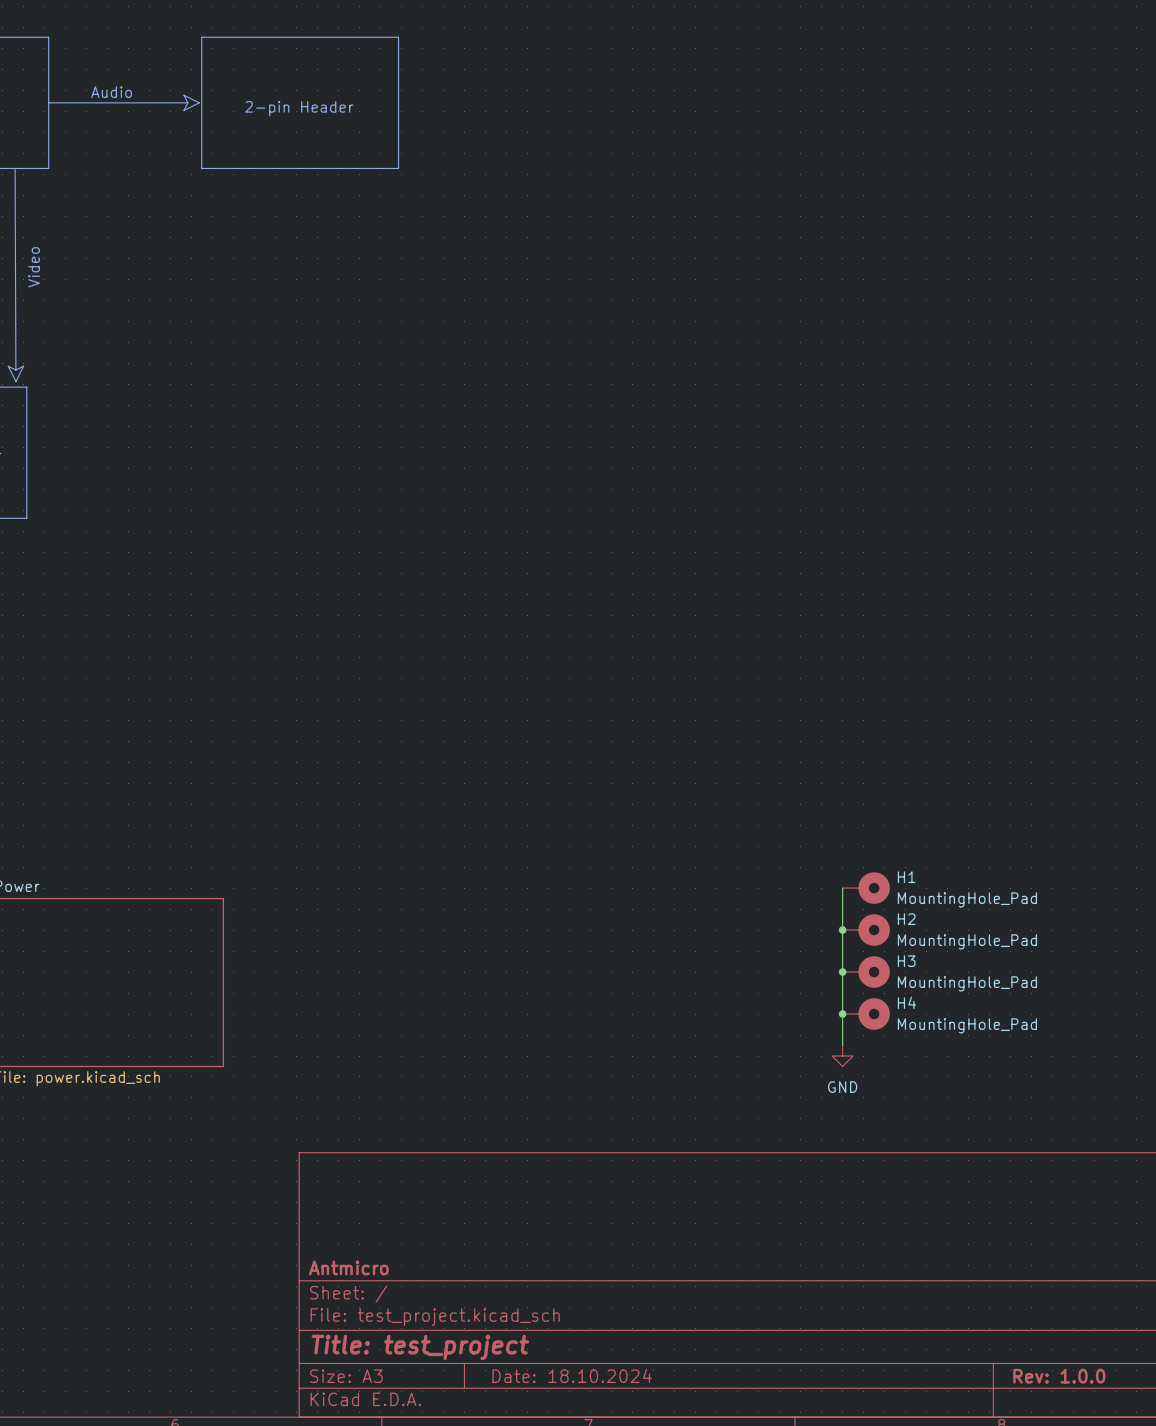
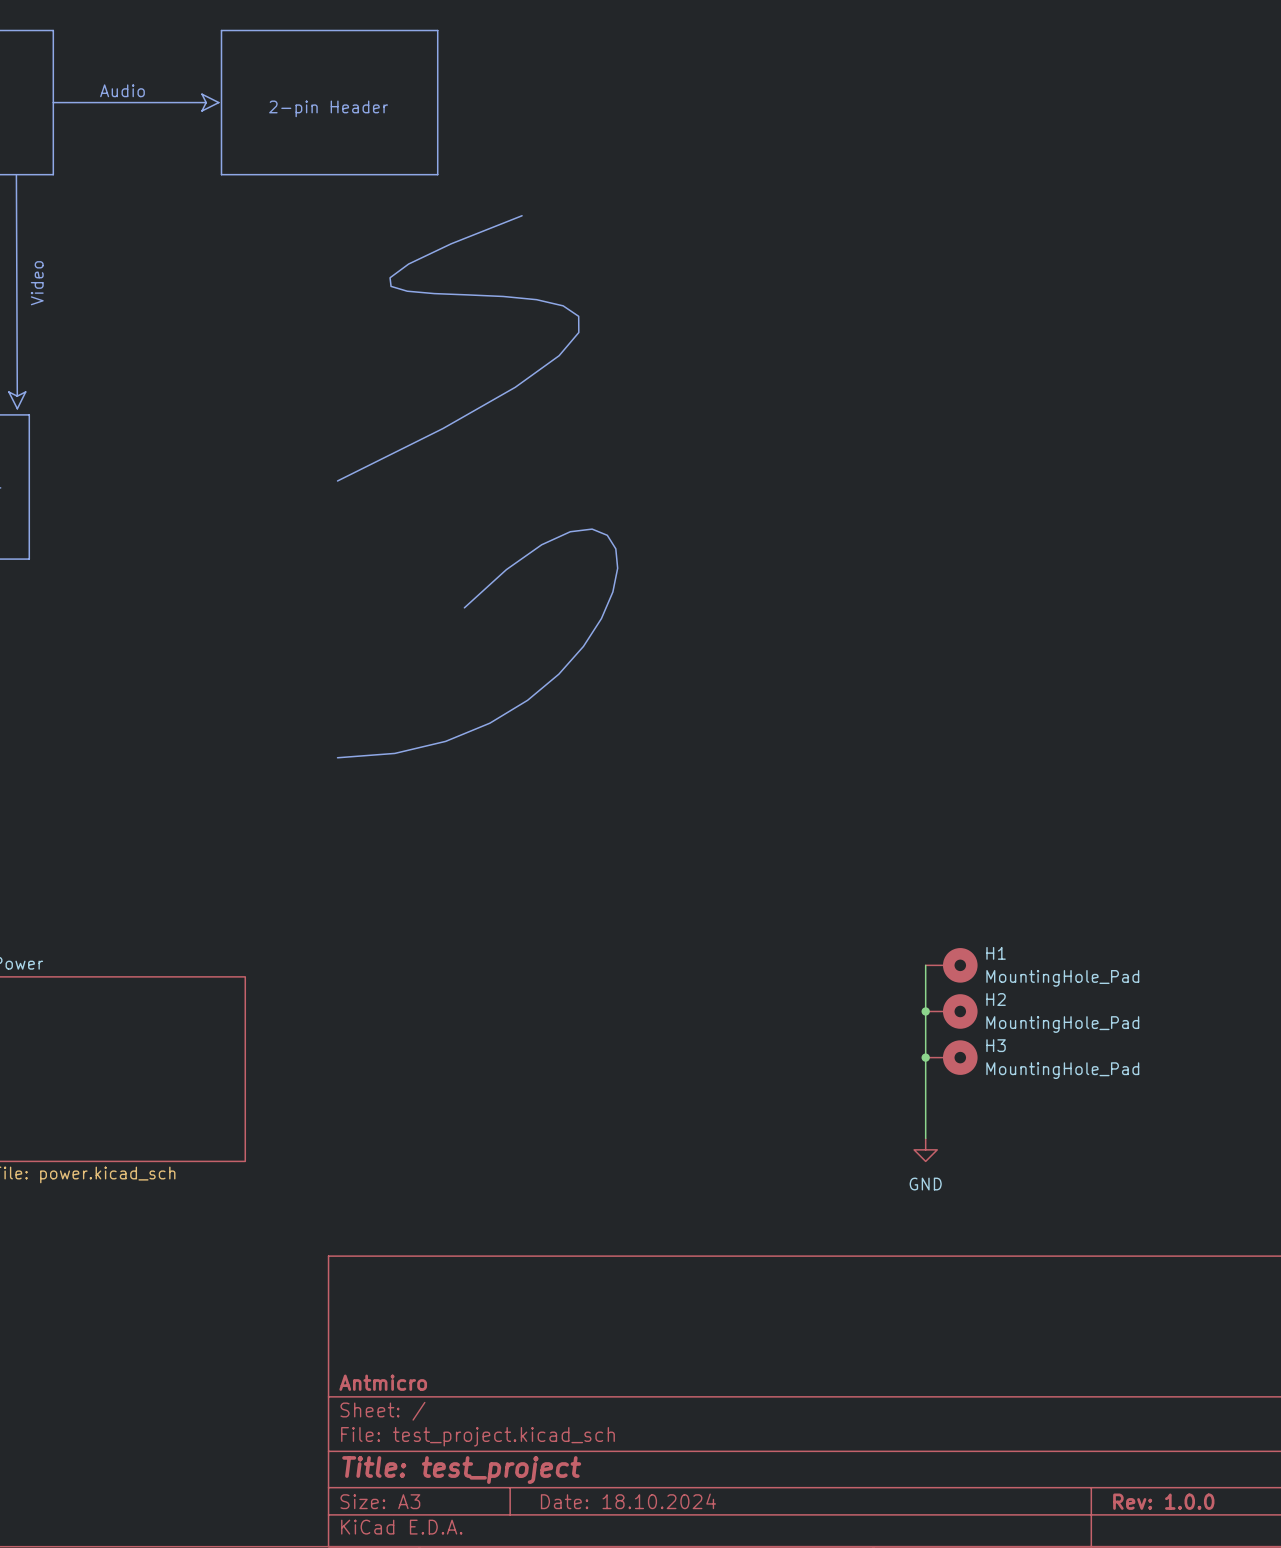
line: none -> (522, 215) (451, 243) (408, 264) (390, 277) (391, 286) (407, 291) (536, 299) (563, 305) (578, 316) (578, 332) (559, 355) (515, 387) (442, 428) (337, 480)
line: none -> (464, 607) (506, 569) (541, 544) (570, 531) (592, 529) (607, 535) (615, 548) (617, 568) (612, 591) (601, 618) (583, 646) (558, 674) (527, 700) (489, 723) (445, 741) (394, 753) (337, 757)
junction: (842, 1014) -> none
H4: MountingHole_Pad (866, 1014) -> none

